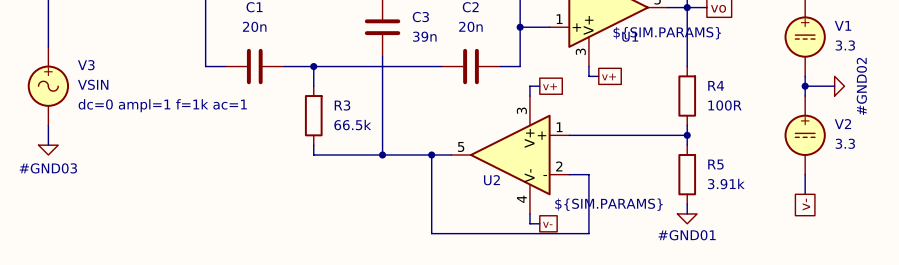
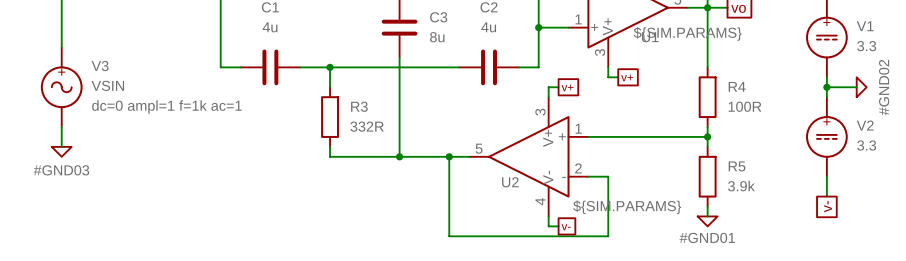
C1 value: 20n (254, 26) -> 4u (270, 27)
C2 value: 20n (470, 26) -> 4u (488, 27)
C3 value: 39n (424, 36) -> 8u (437, 37)
R3 value: 66.5k (352, 125) -> 332R (367, 126)
R5 value: 3.91k (726, 184) -> 3.9k (741, 186)

